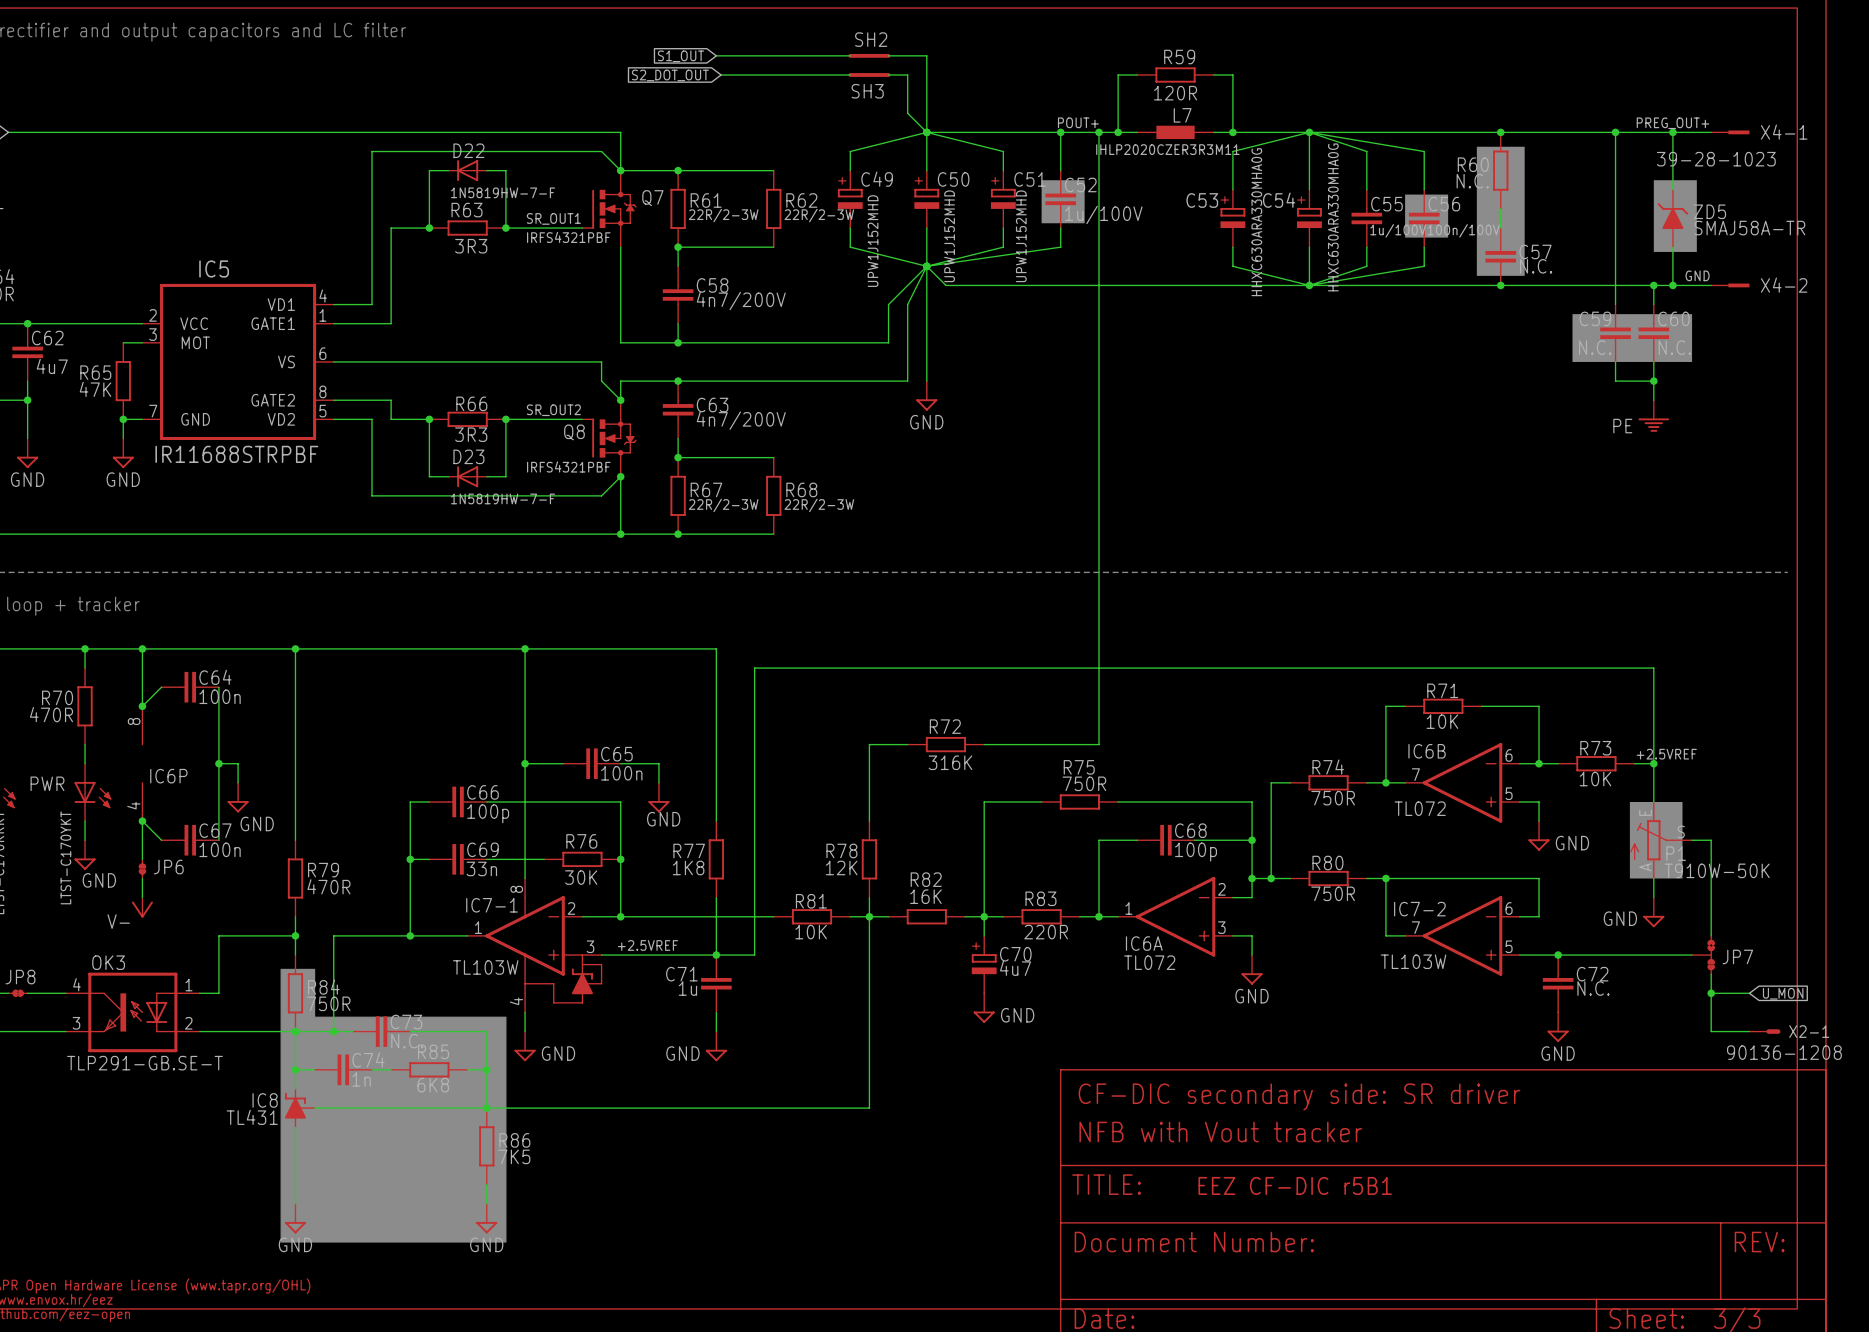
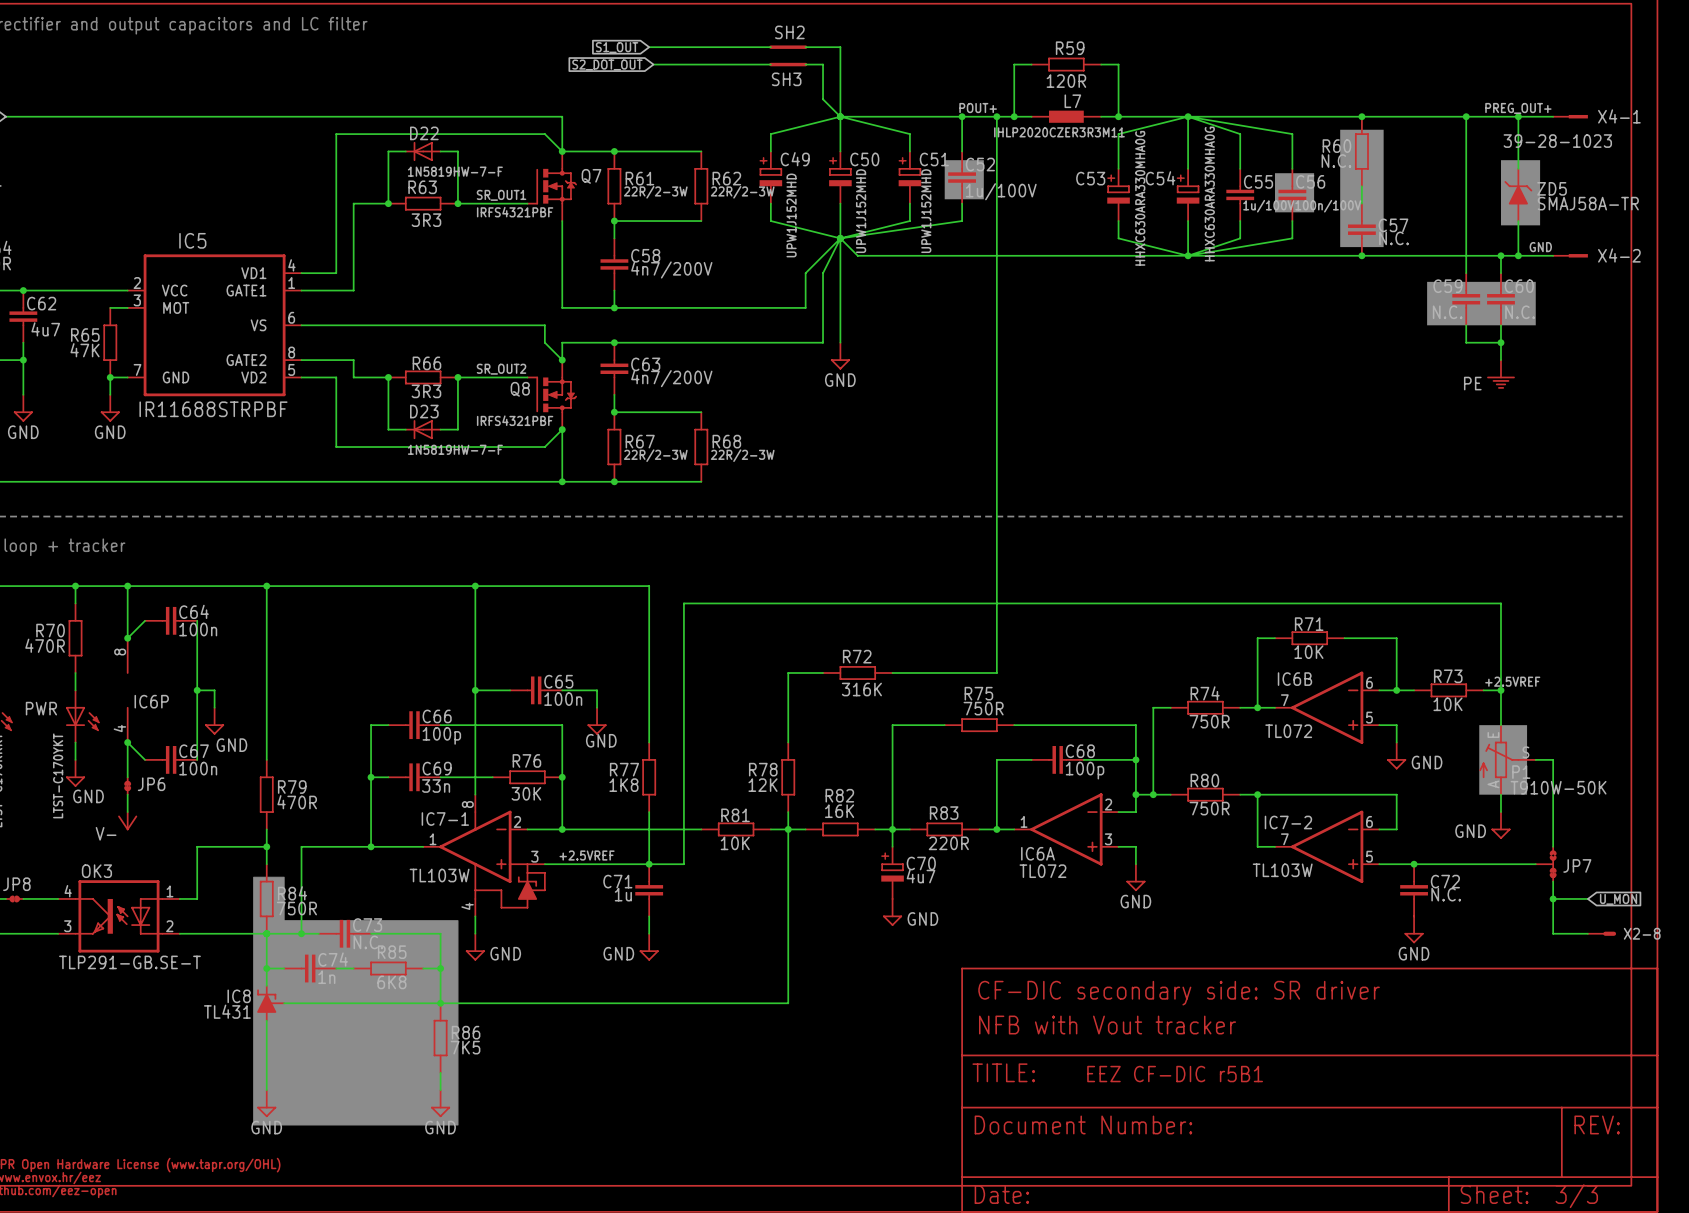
X2-1 name: X2-1 (1809, 1031) -> X2-8 (1642, 933)
X2-1 value: 90136-1208 (1784, 1052) -> none

